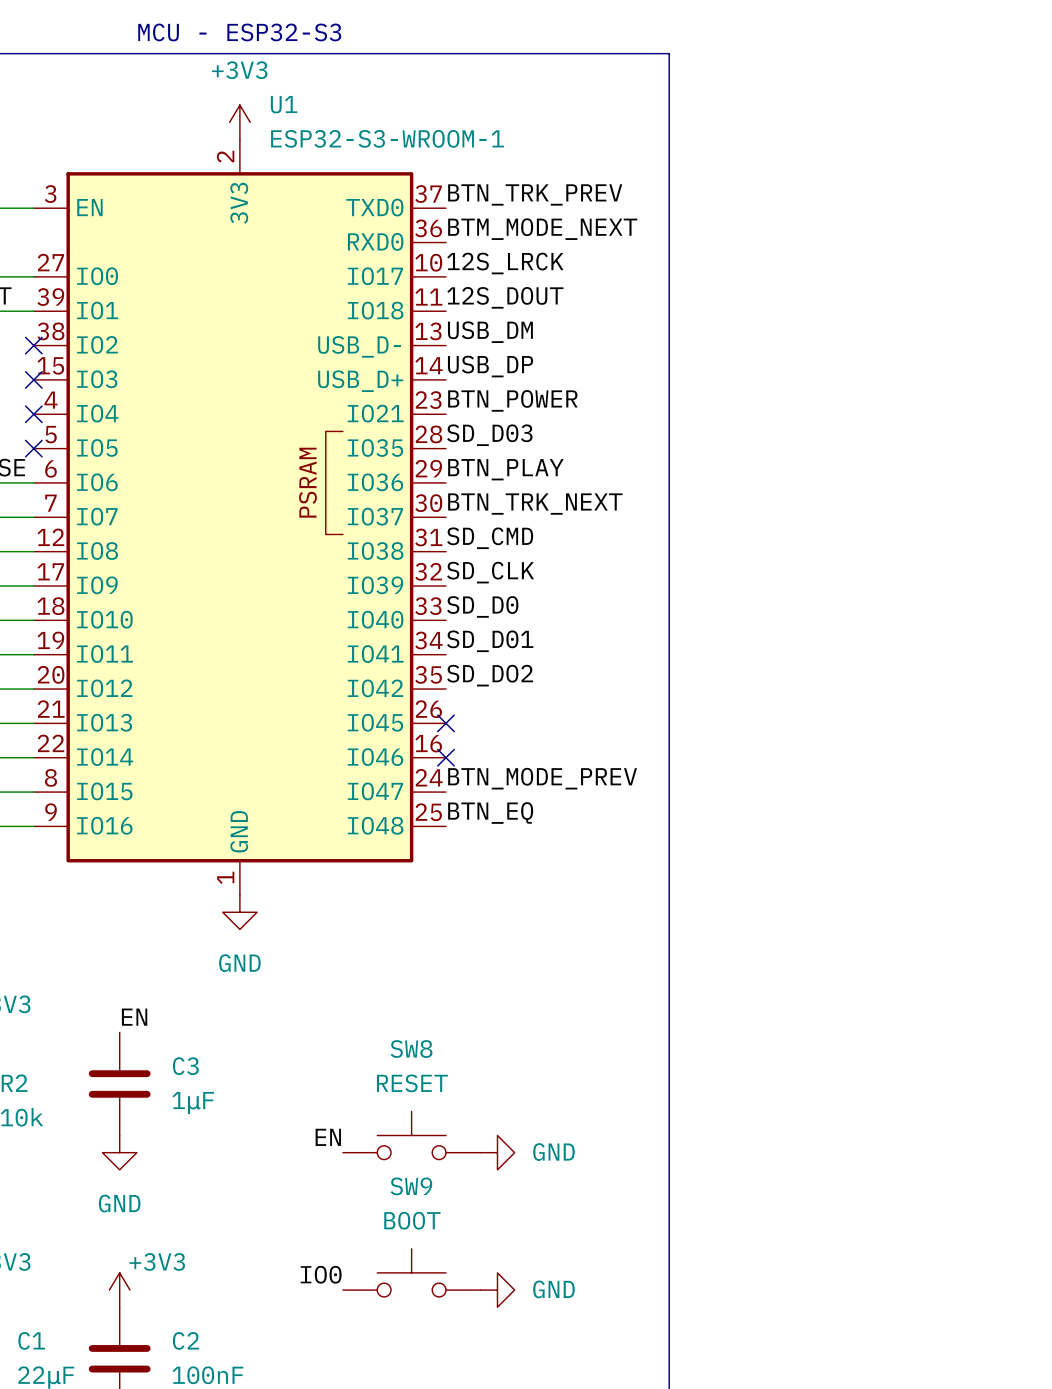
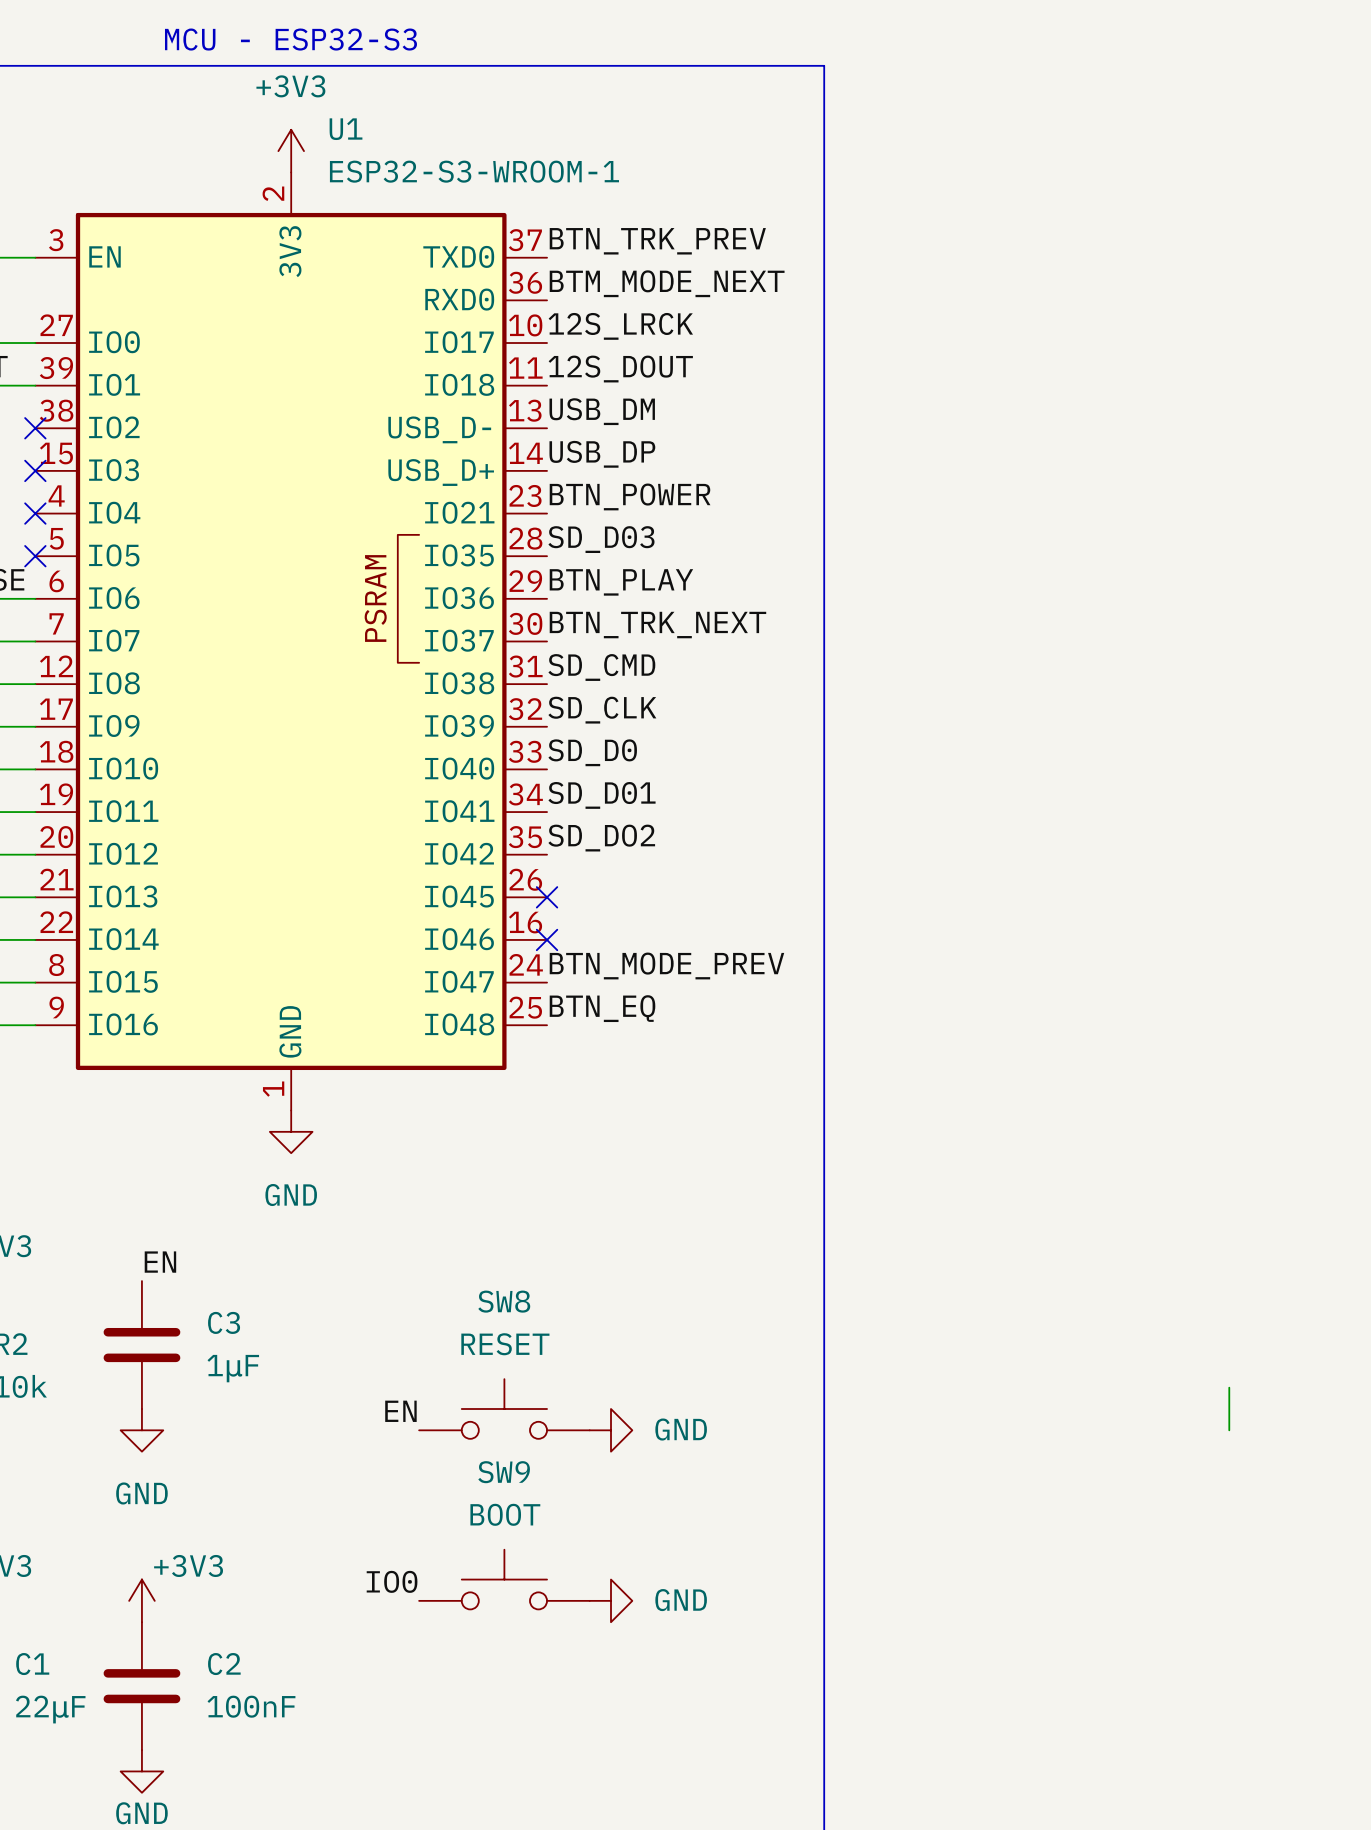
wire: none -> (1229, 1387) (1229, 1430)

